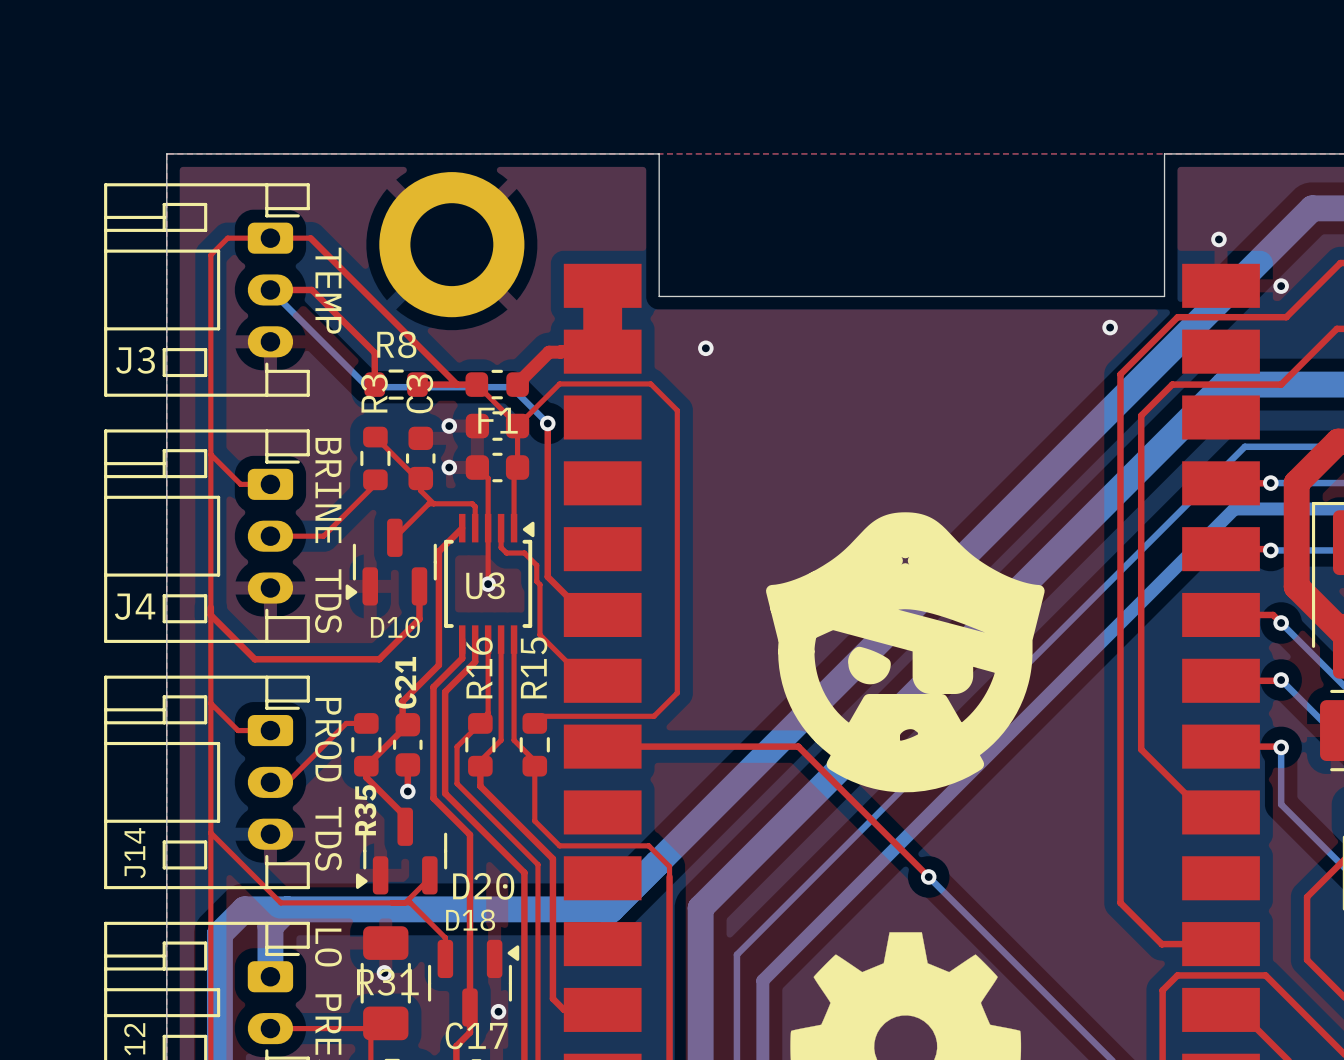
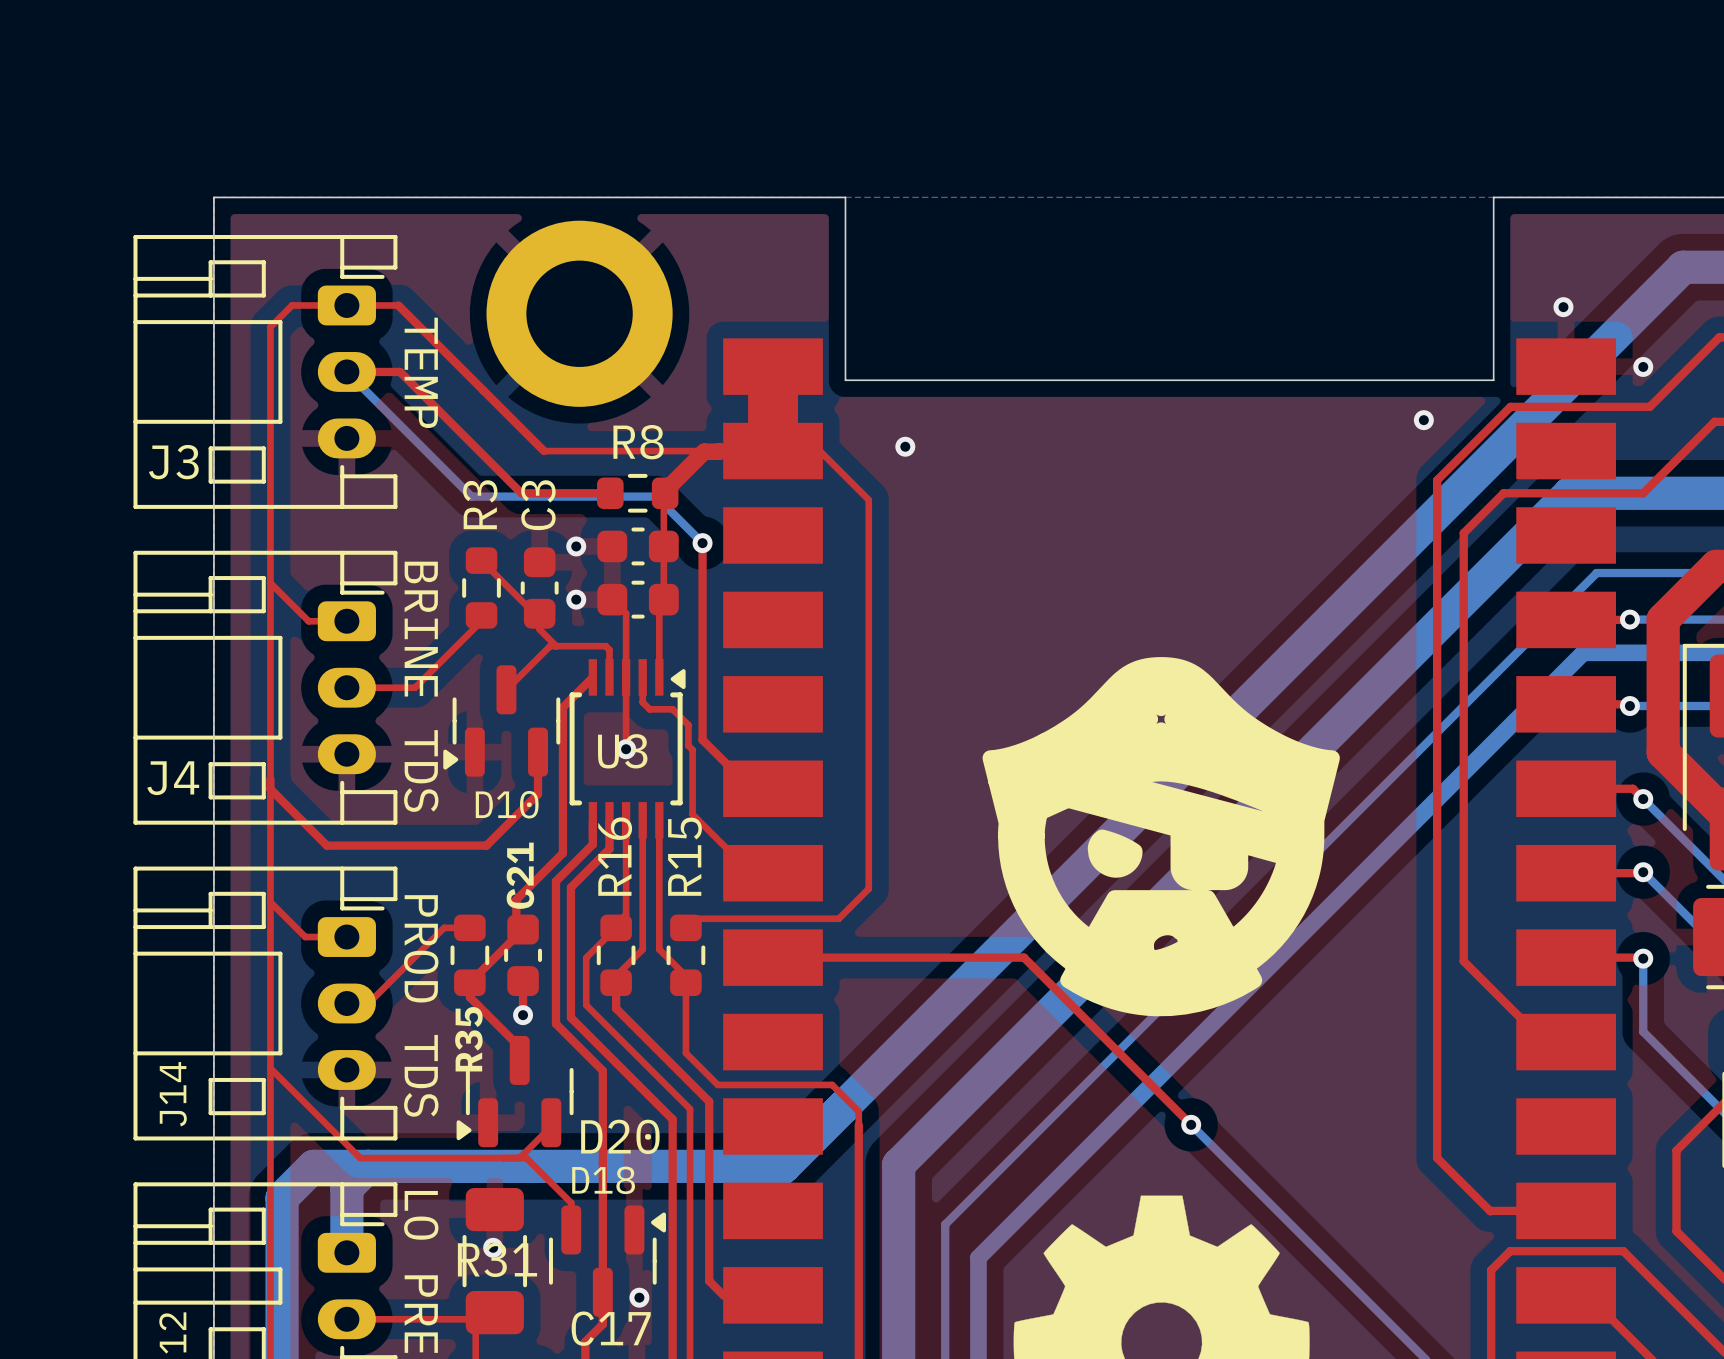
top track: (424, 351) (457, 384) -> none
top track: (374, 352) (374, 384) -> (480, 452) (521, 493) (535, 493)
R8 position: (396, 384) -> (637, 493)
top track: (475, 384) (517, 425) -> (544, 451) (719, 451) (709, 451) (667, 493) (663, 494) (663, 545)
F1: (497, 384) -> none
top track: (677, 410) (650, 383) (559, 383) (519, 423) -> (868, 526) (868, 499) (819, 451) (733, 451) (773, 451)

